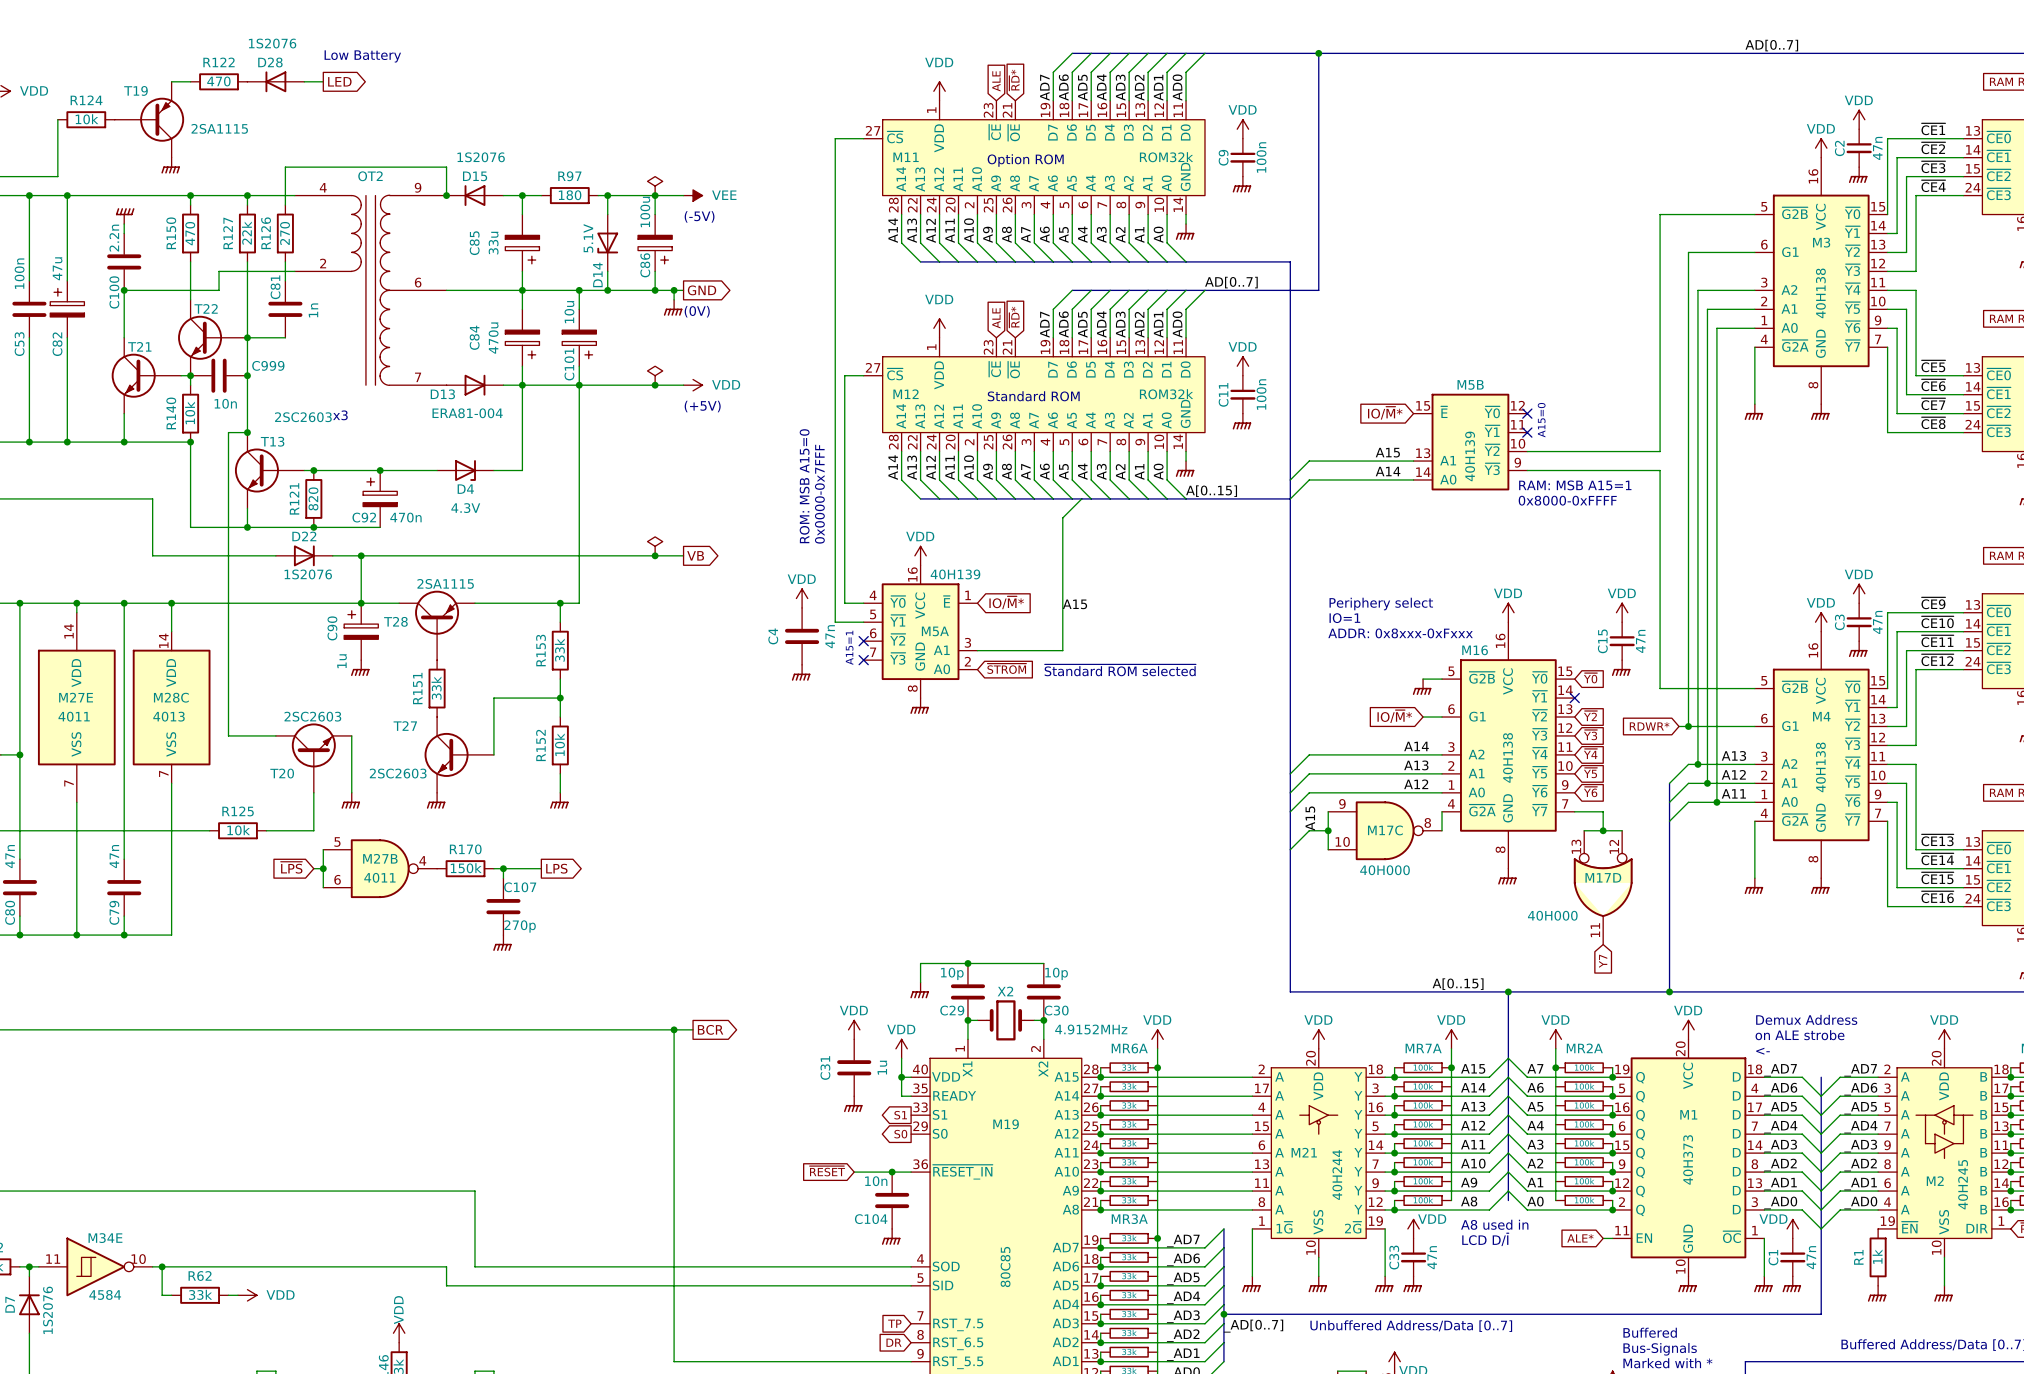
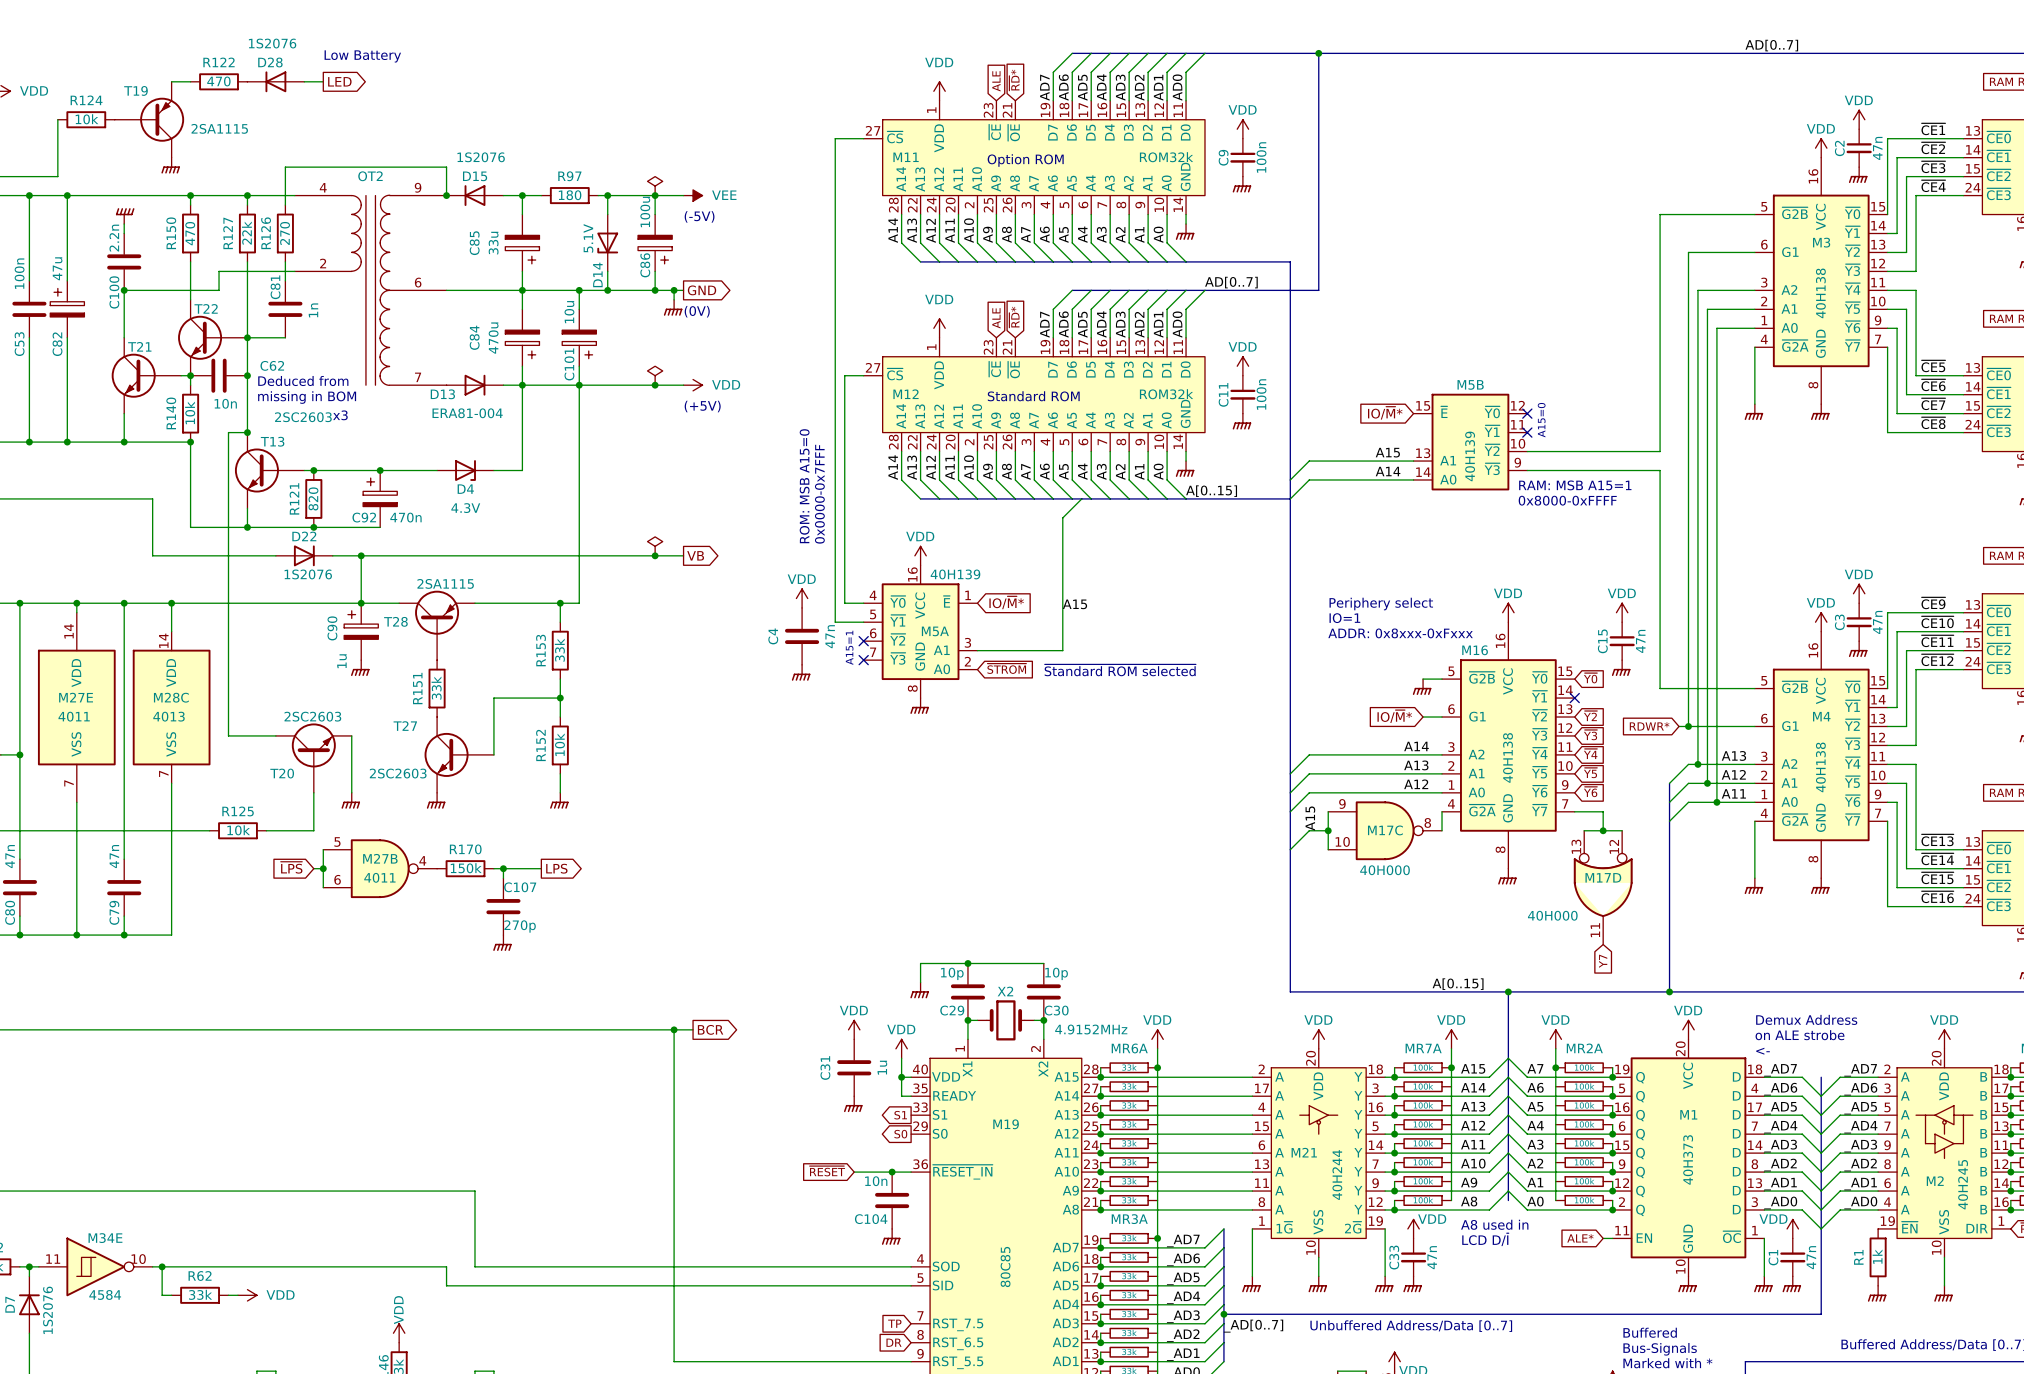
C999 name: C999 (268, 365) -> C62 (272, 365)
text: none -> Deduced from (303, 381)
text: none -> missing in BOM (307, 397)

